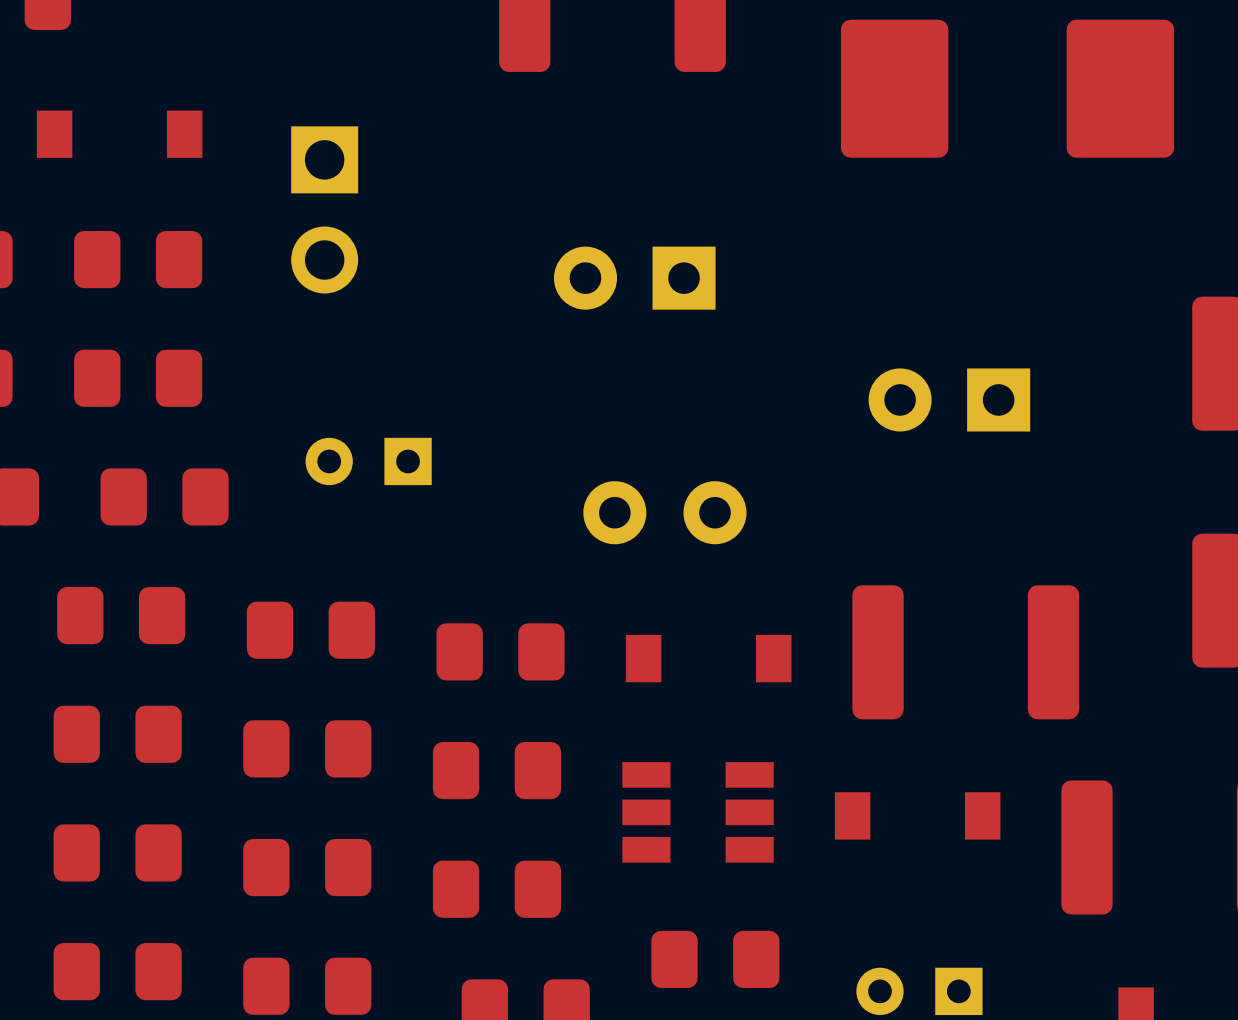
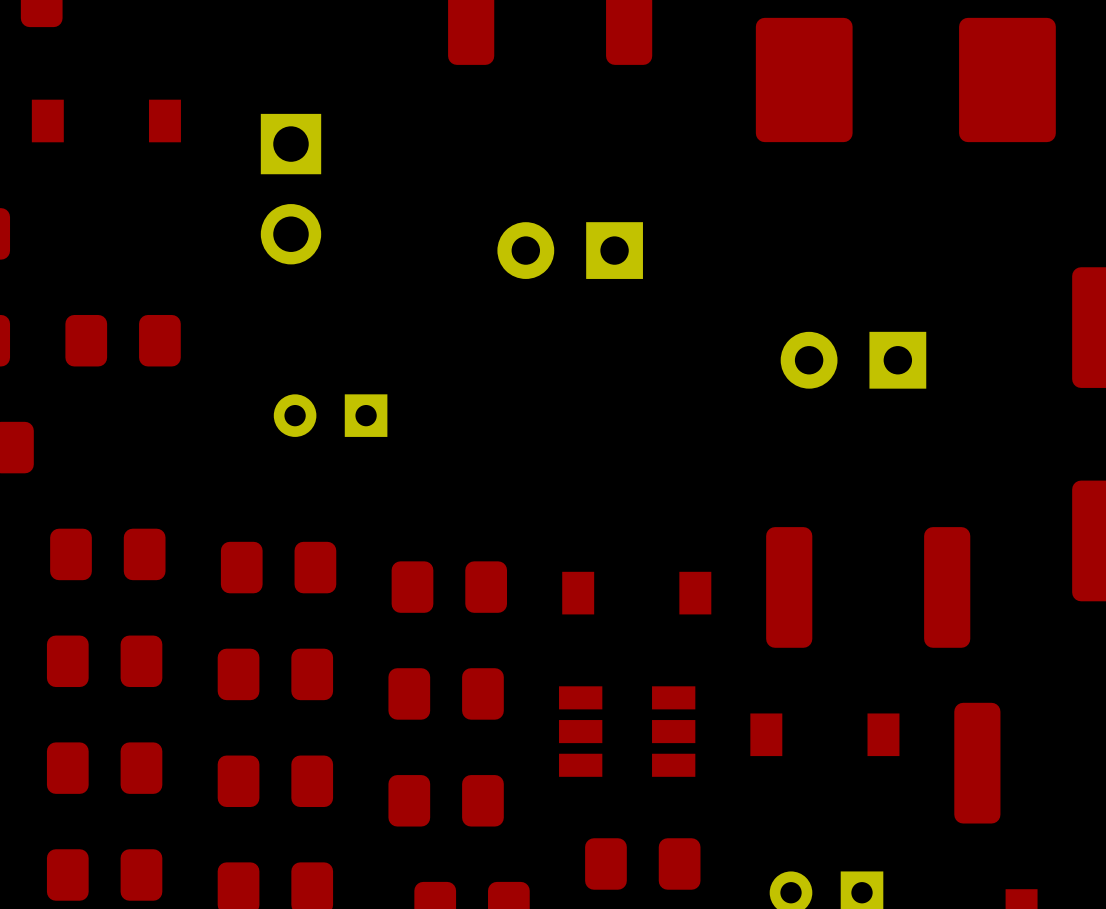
part: (138, 259) -> none
part: (164, 496) -> none
part: (664, 512) -> none

